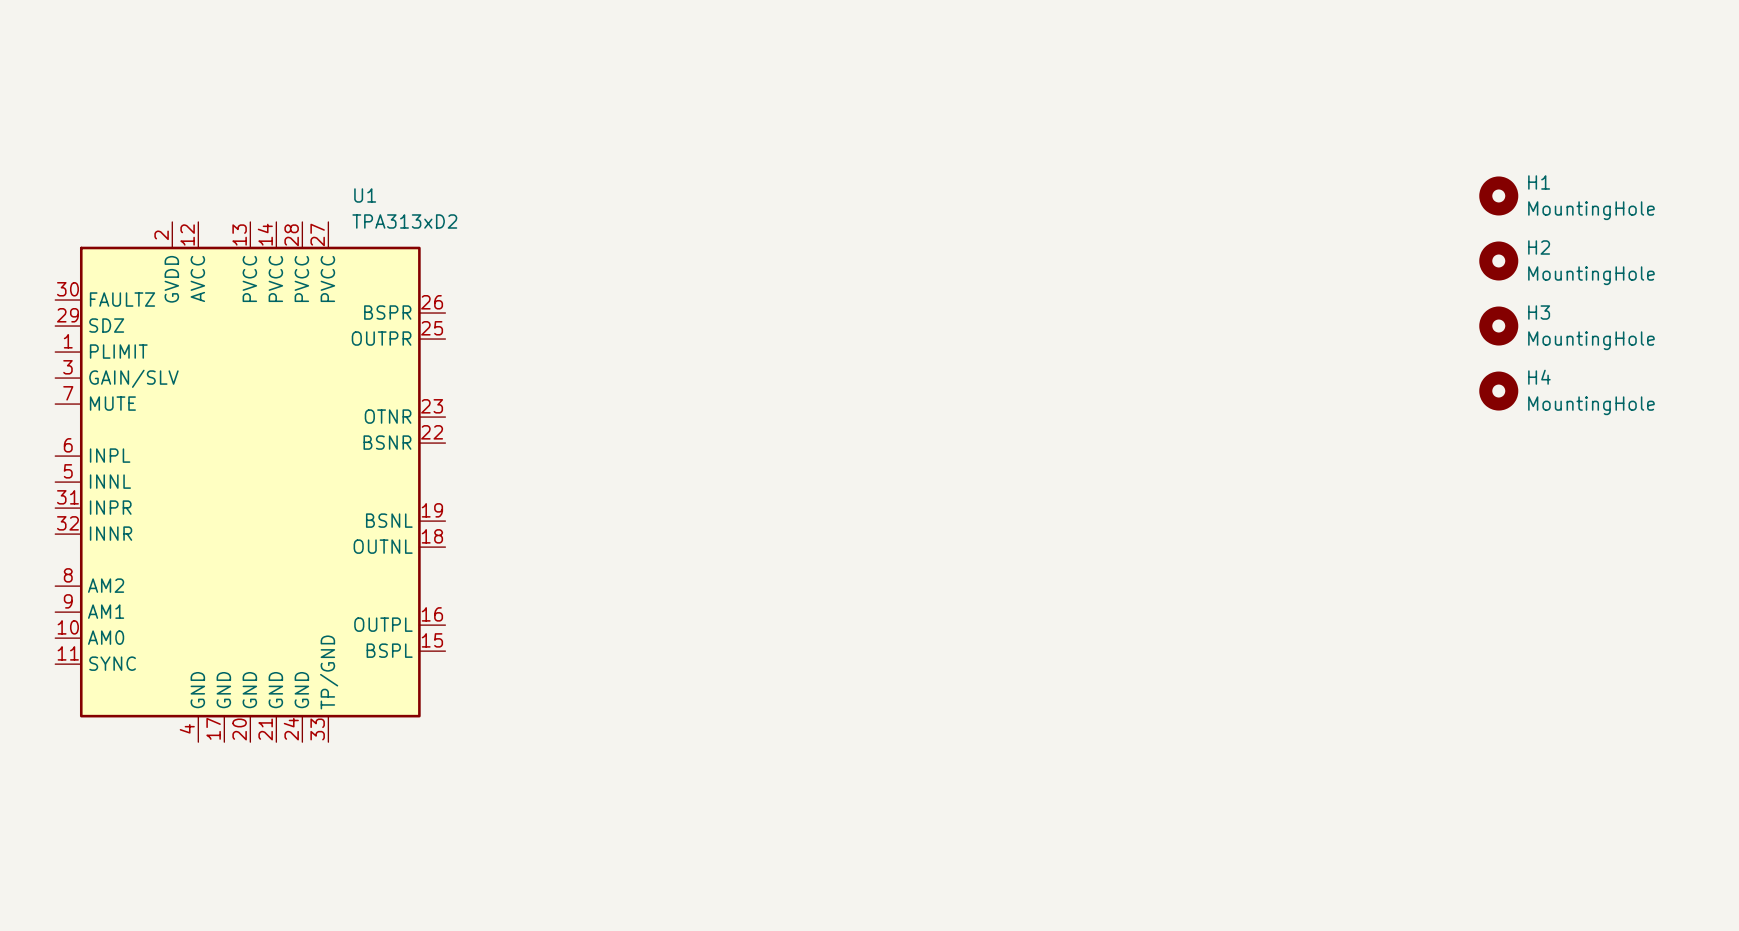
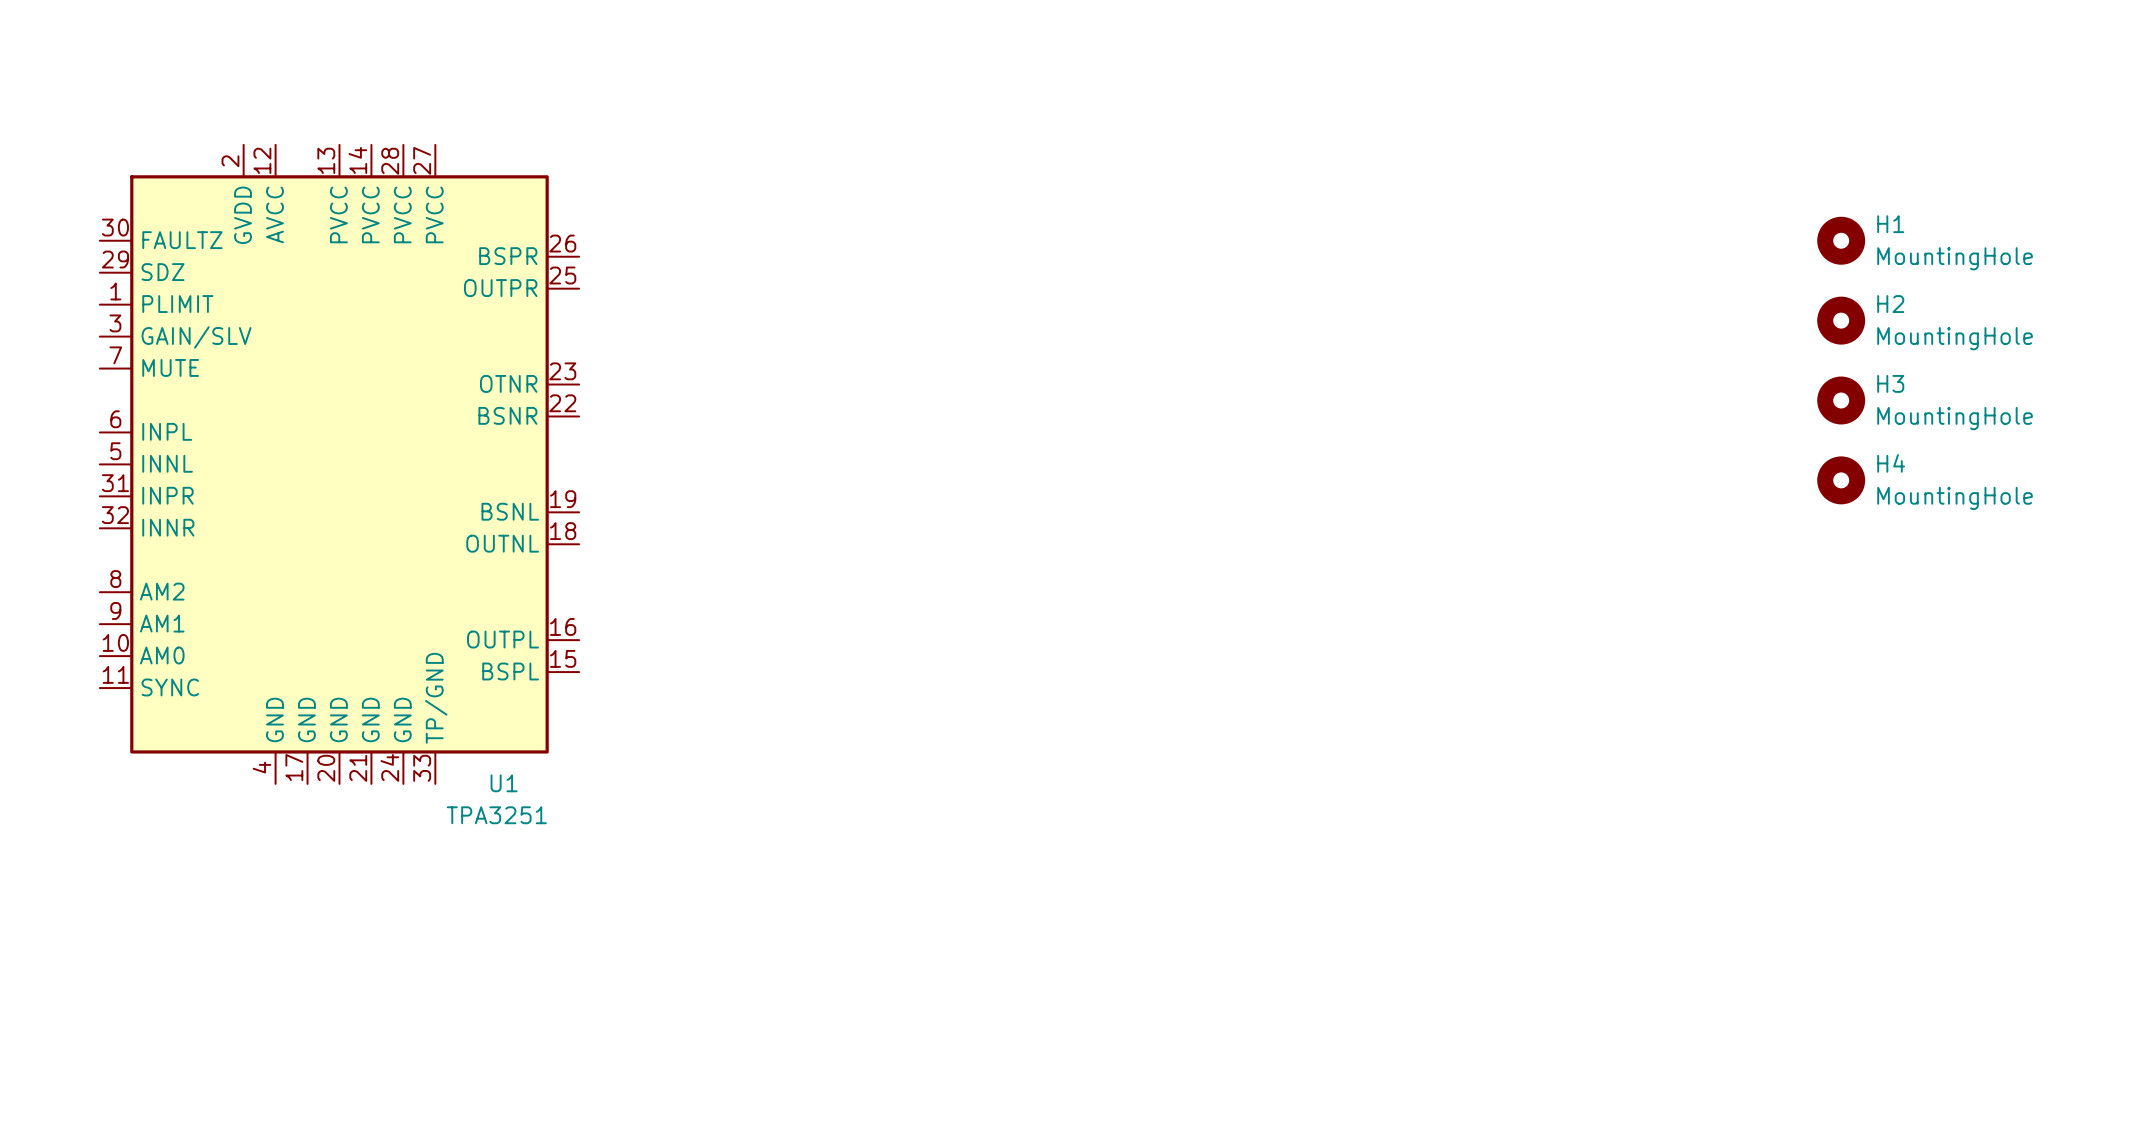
U1 name position: U1 (365, 195) -> U1 (504, 783)
U1 value: TPA313xD2 (404, 221) -> TPA3251 (496, 815)
U1 position: (250, 482) -> (339, 464)

